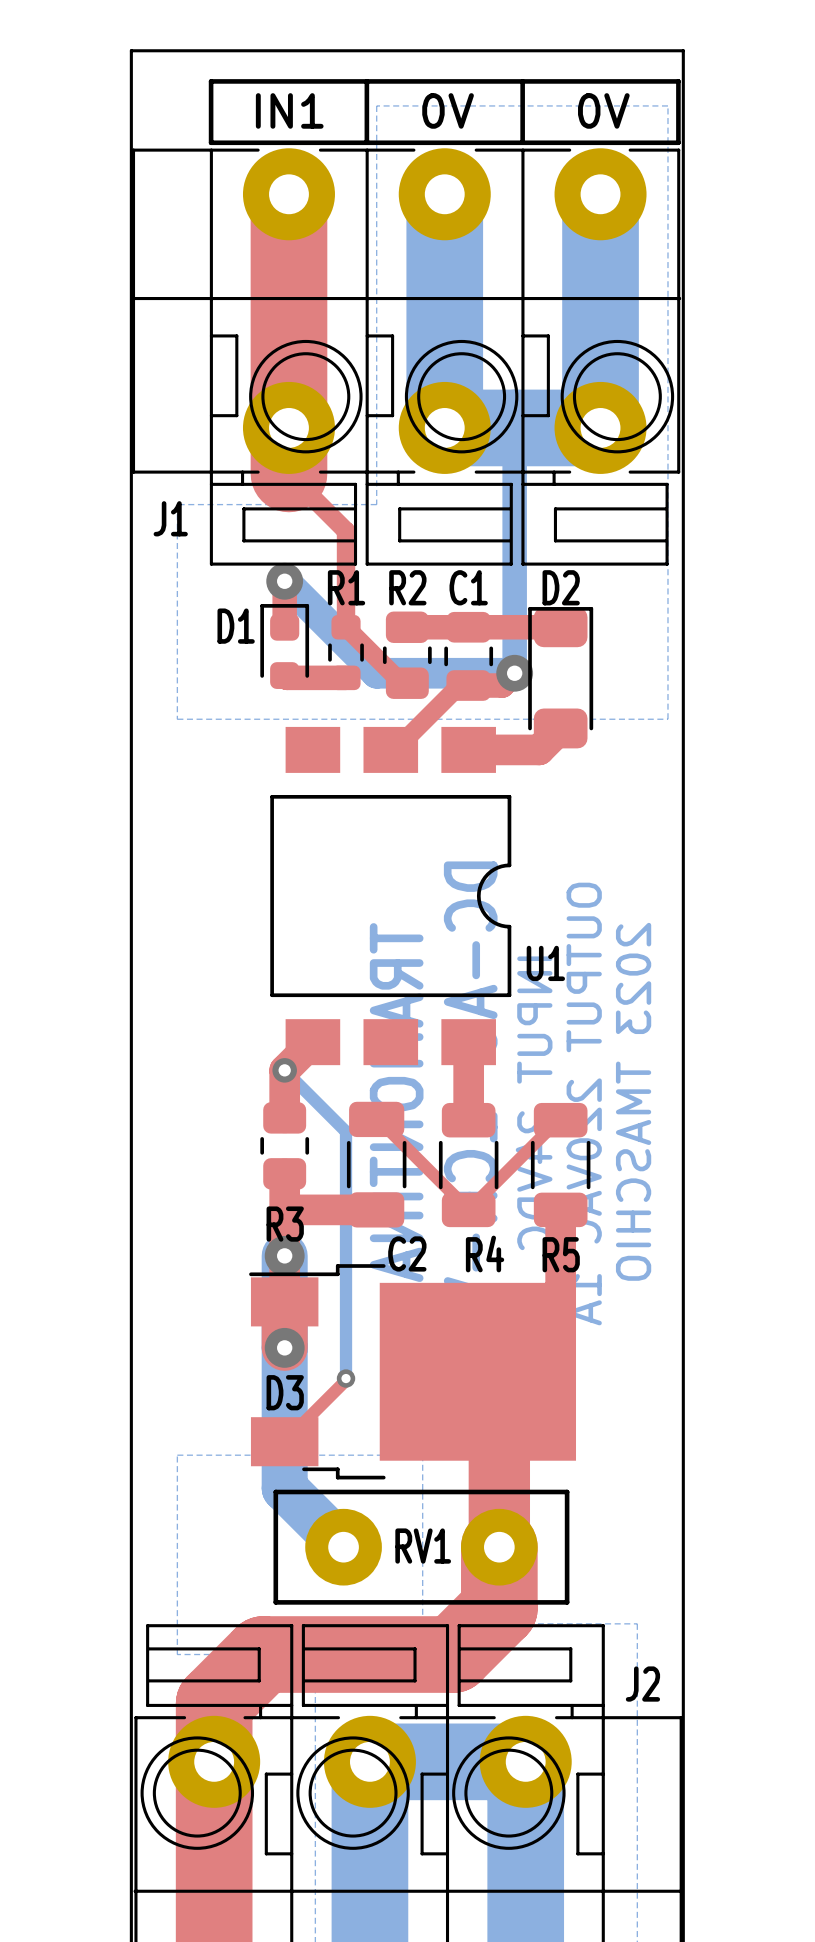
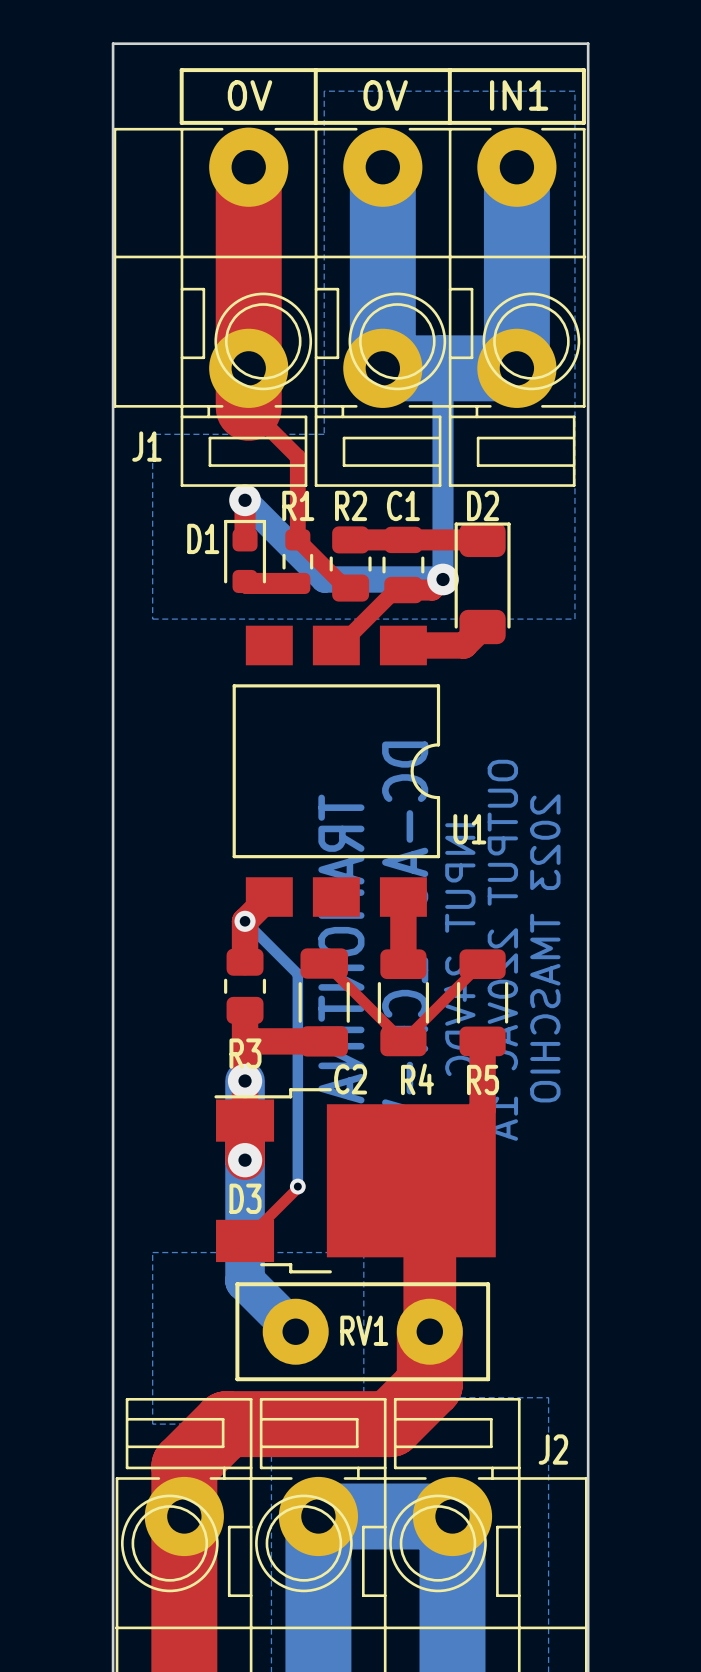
text: IN1 (289, 110) -> 0V (249, 95)
text: 0V (603, 110) -> IN1 (519, 95)

